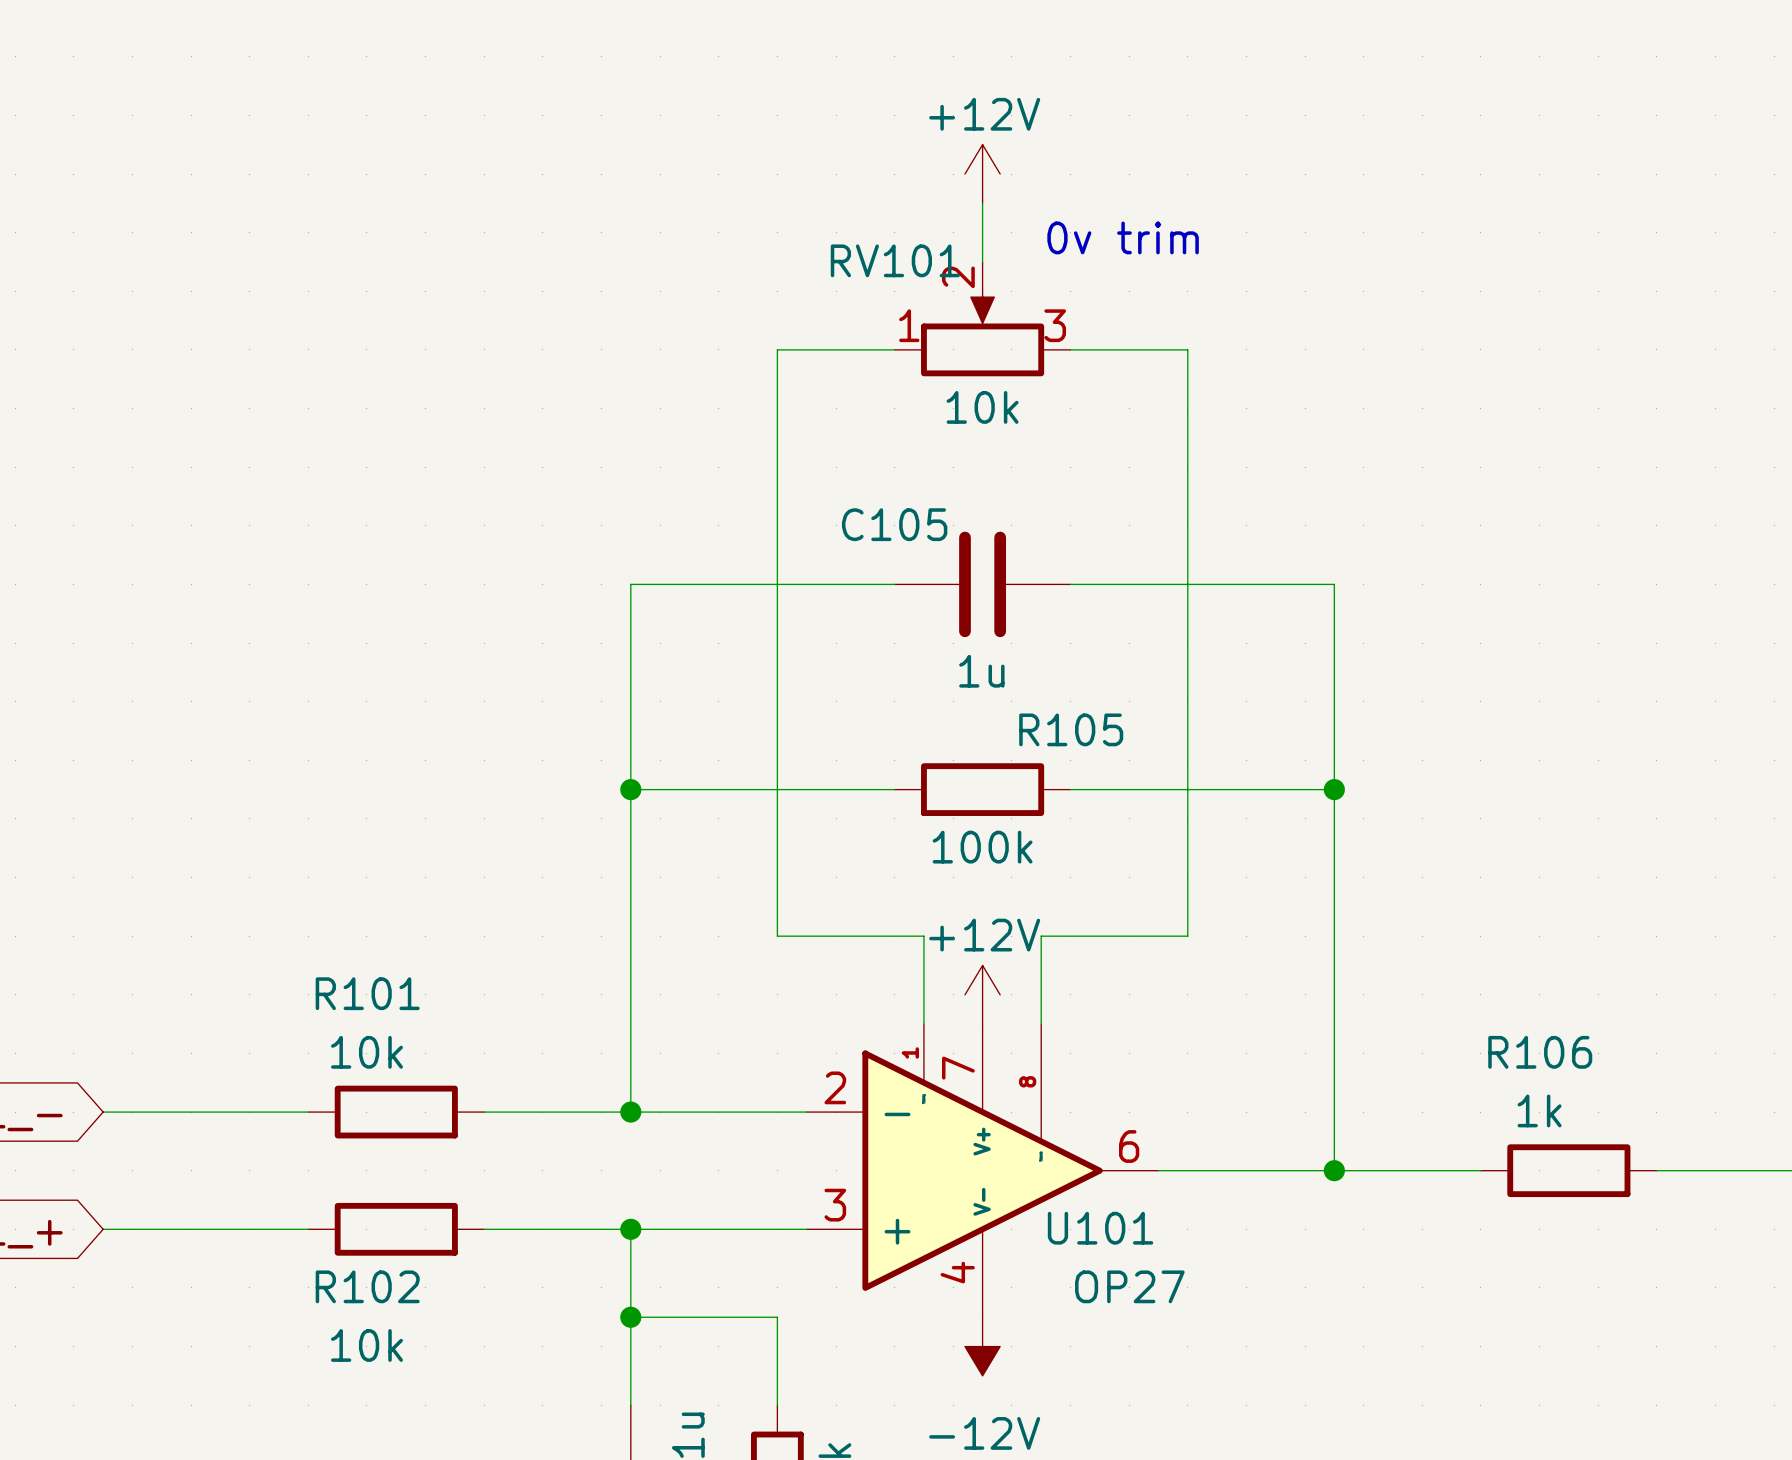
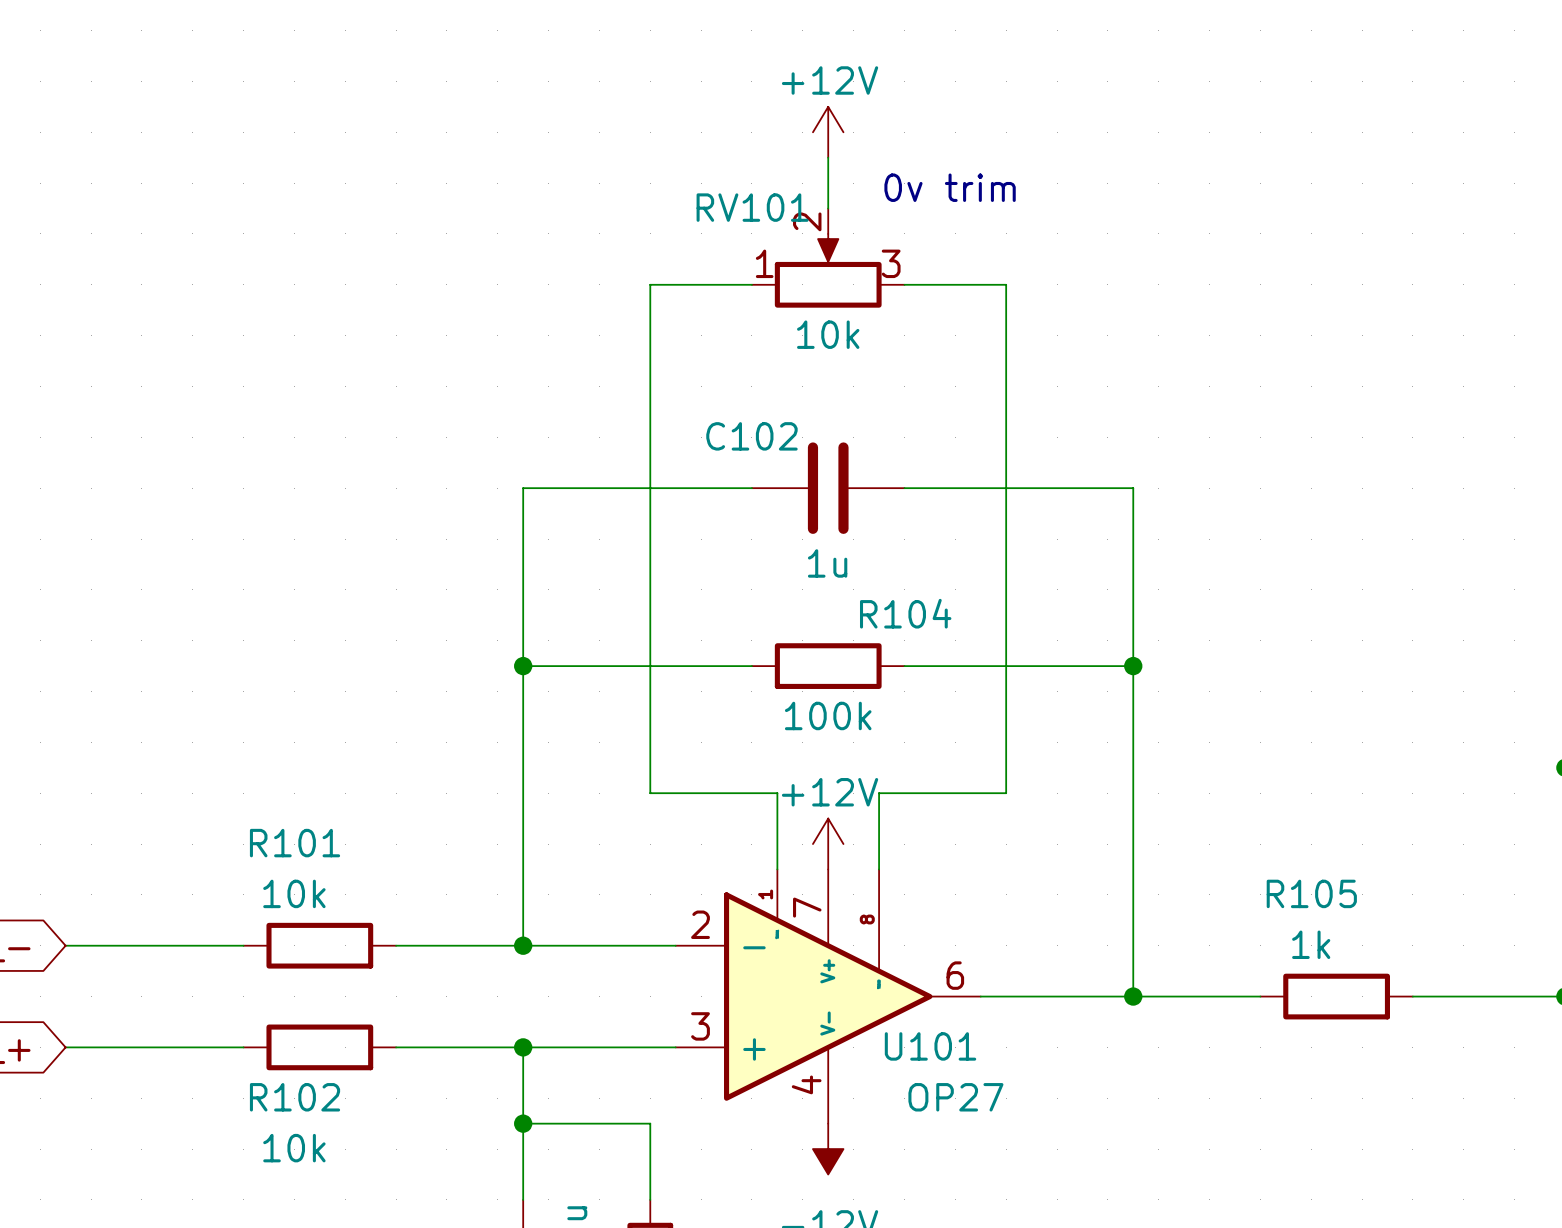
C105 name: C105 (894, 524) -> C102 (751, 436)
R105 name: R105 (1071, 729) -> R104 (905, 613)
R106 name: R106 (1540, 1052) -> R105 (1311, 893)

